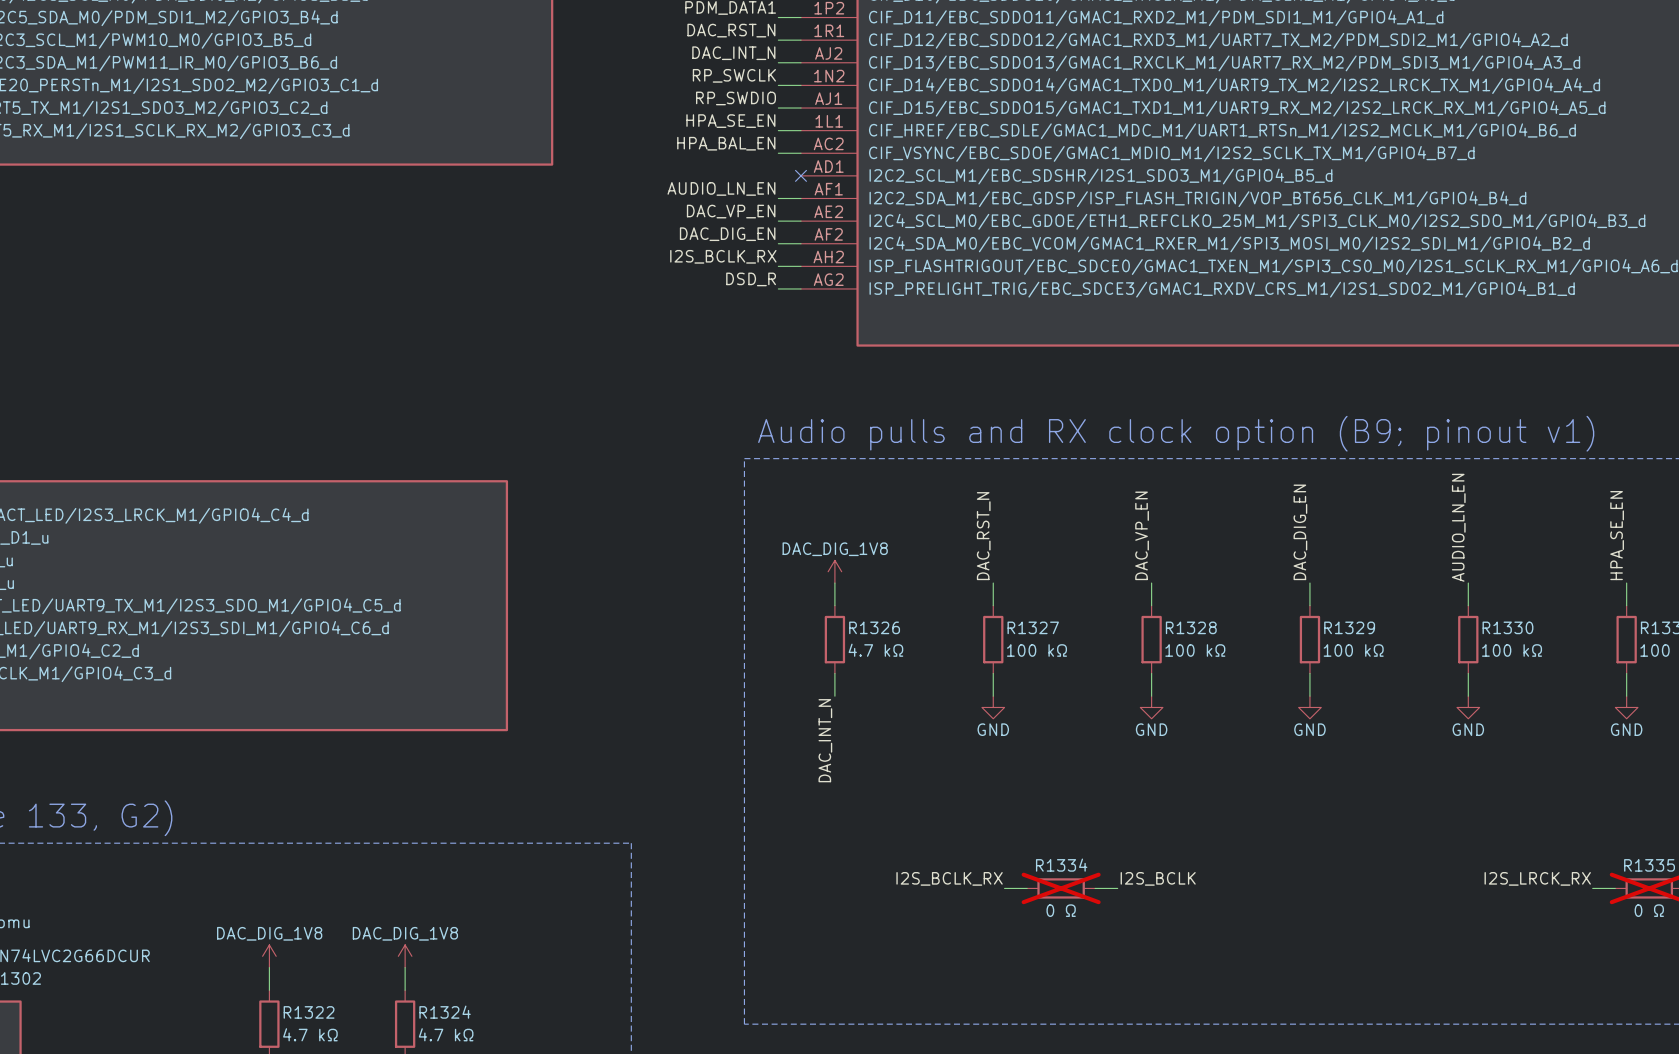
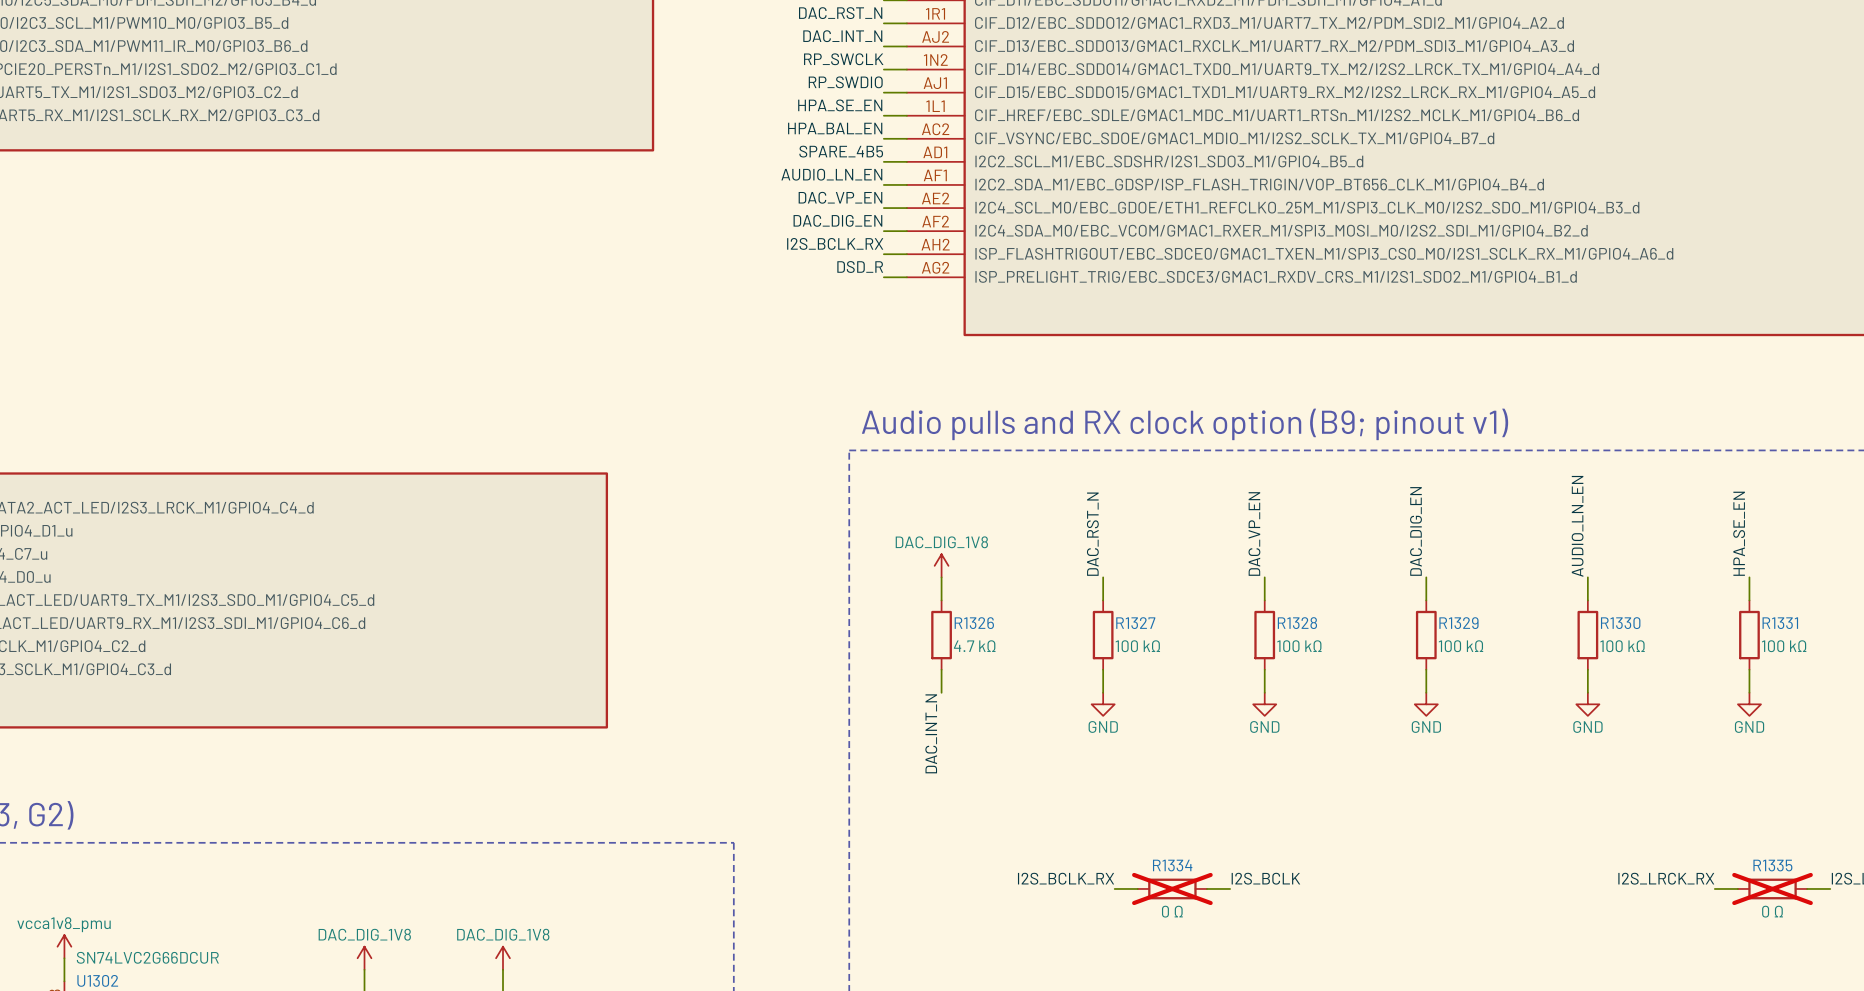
label: none -> SPARE_4B5 (841, 151)
wire: none -> (883, 161) (906, 161)
no-connect mark: (800, 175) -> none

